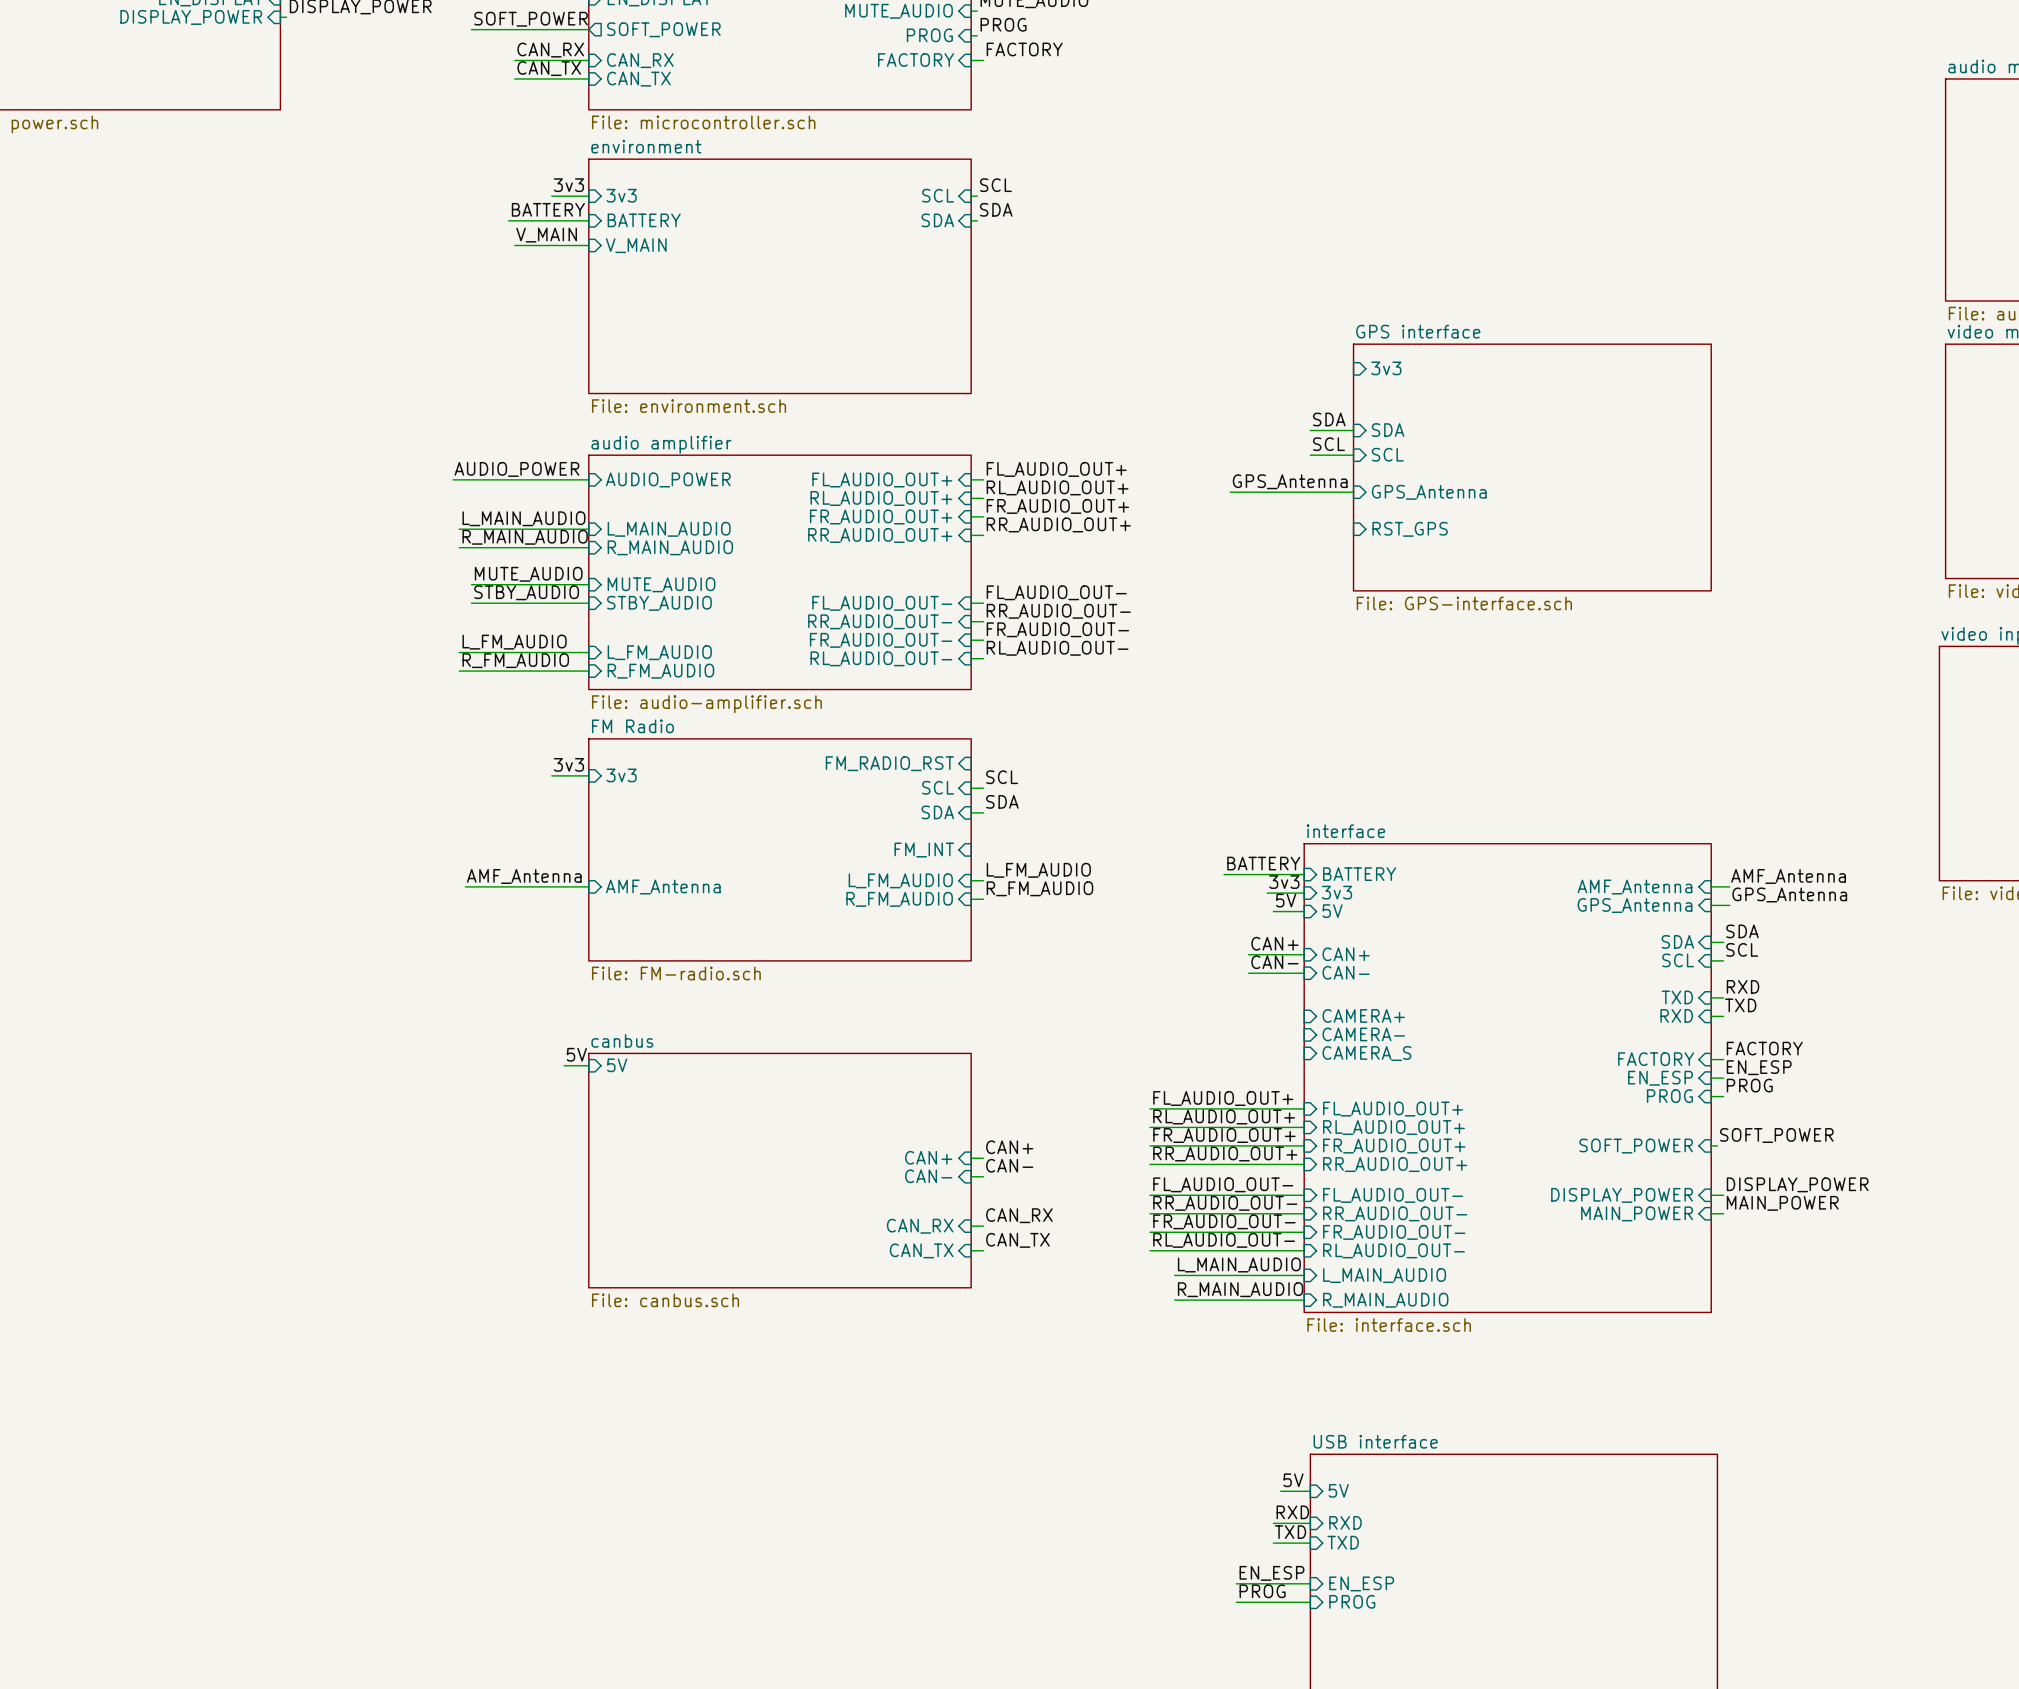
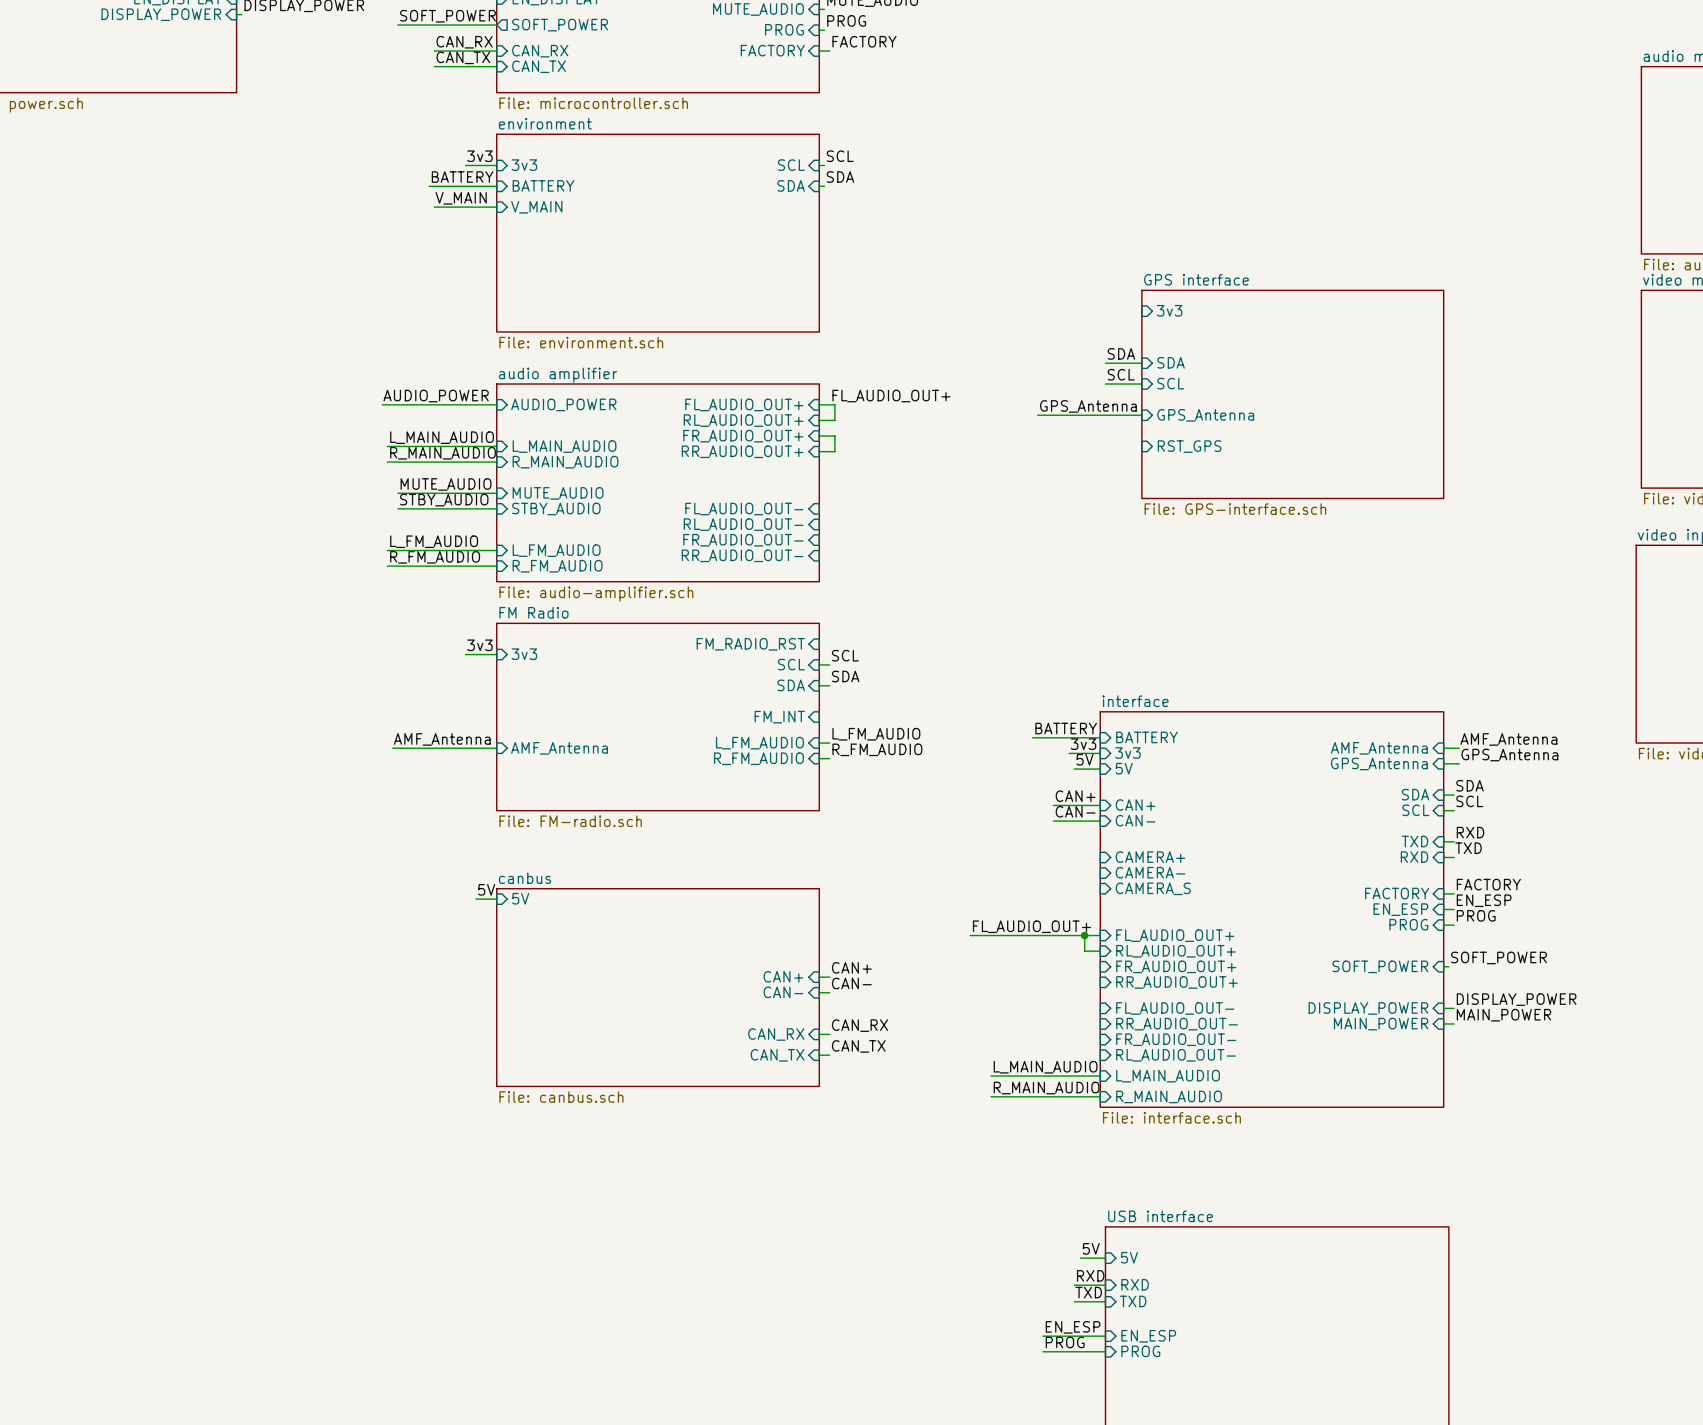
wire: none -> (829, 404) (834, 404) (834, 420) (829, 420)
label: RL_AUDIO_OUT+ (1057, 487) -> none
label: FR_AUDIO_OUT+ (1057, 506) -> none
wire: none -> (829, 436) (834, 436) (834, 451) (829, 451)
label: RR_AUDIO_OUT+ (1058, 524) -> none
label: FL_AUDIO_OUT- (1056, 592) -> none
wire: (971, 603) (983, 603) -> none
label: RR_AUDIO_OUT- (1058, 611) -> none
sheet pin: RR_AUDIO_OUT- (880, 621) -> RL_AUDIO_OUT- (743, 524)
wire: (971, 621) (983, 621) -> none
label: FR_AUDIO_OUT- (1057, 629) -> none
wire: (971, 640) (983, 640) -> none
label: RL_AUDIO_OUT- (1057, 648) -> none
sheet pin: RL_AUDIO_OUT- (881, 658) -> RR_AUDIO_OUT- (742, 555)
wire: (971, 658) (983, 658) -> none
junction: none -> (1084, 935)
label: RL_AUDIO_OUT+ (1224, 1117) -> none
wire: (1150, 1127) (1285, 1127) -> (1084, 935) (1084, 951)
label: FR_AUDIO_OUT+ (1224, 1135) -> none
wire: (1150, 1145) (1304, 1145) -> none
label: RR_AUDIO_OUT+ (1225, 1154) -> none
wire: (1150, 1164) (1304, 1164) -> none
label: FL_AUDIO_OUT- (1223, 1184) -> none
wire: (1150, 1195) (1304, 1195) -> none
label: RR_AUDIO_OUT- (1225, 1203) -> none
wire: (1150, 1213) (1304, 1213) -> none
label: FR_AUDIO_OUT- (1224, 1221) -> none
wire: (1150, 1232) (1304, 1232) -> none
label: RL_AUDIO_OUT- (1224, 1240) -> none
wire: (1150, 1250) (1304, 1250) -> none

